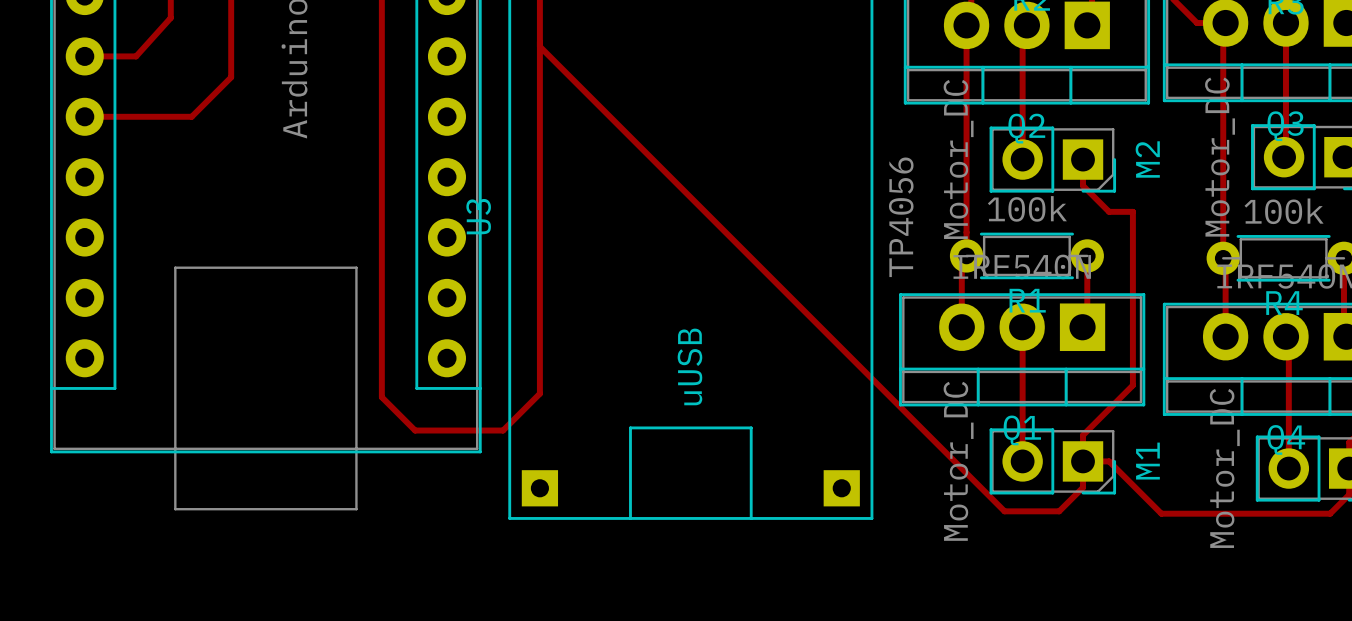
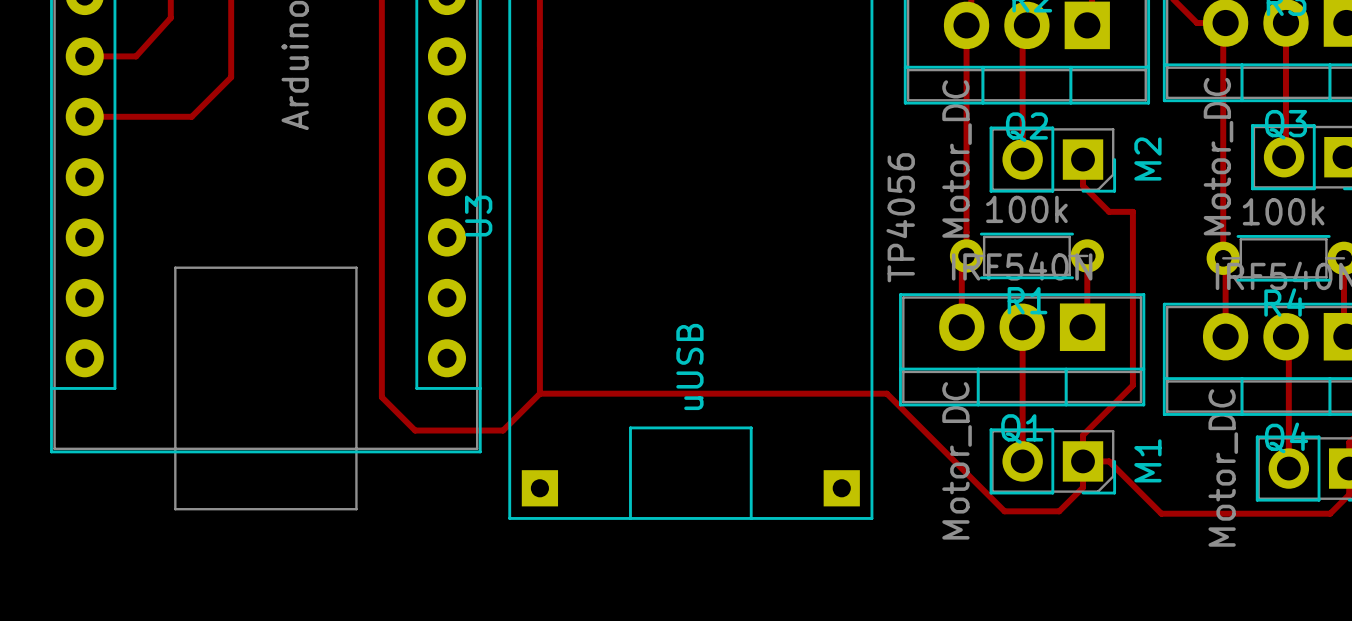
top track: (539, 46) (886, 393) -> (539, 393) (886, 393)

